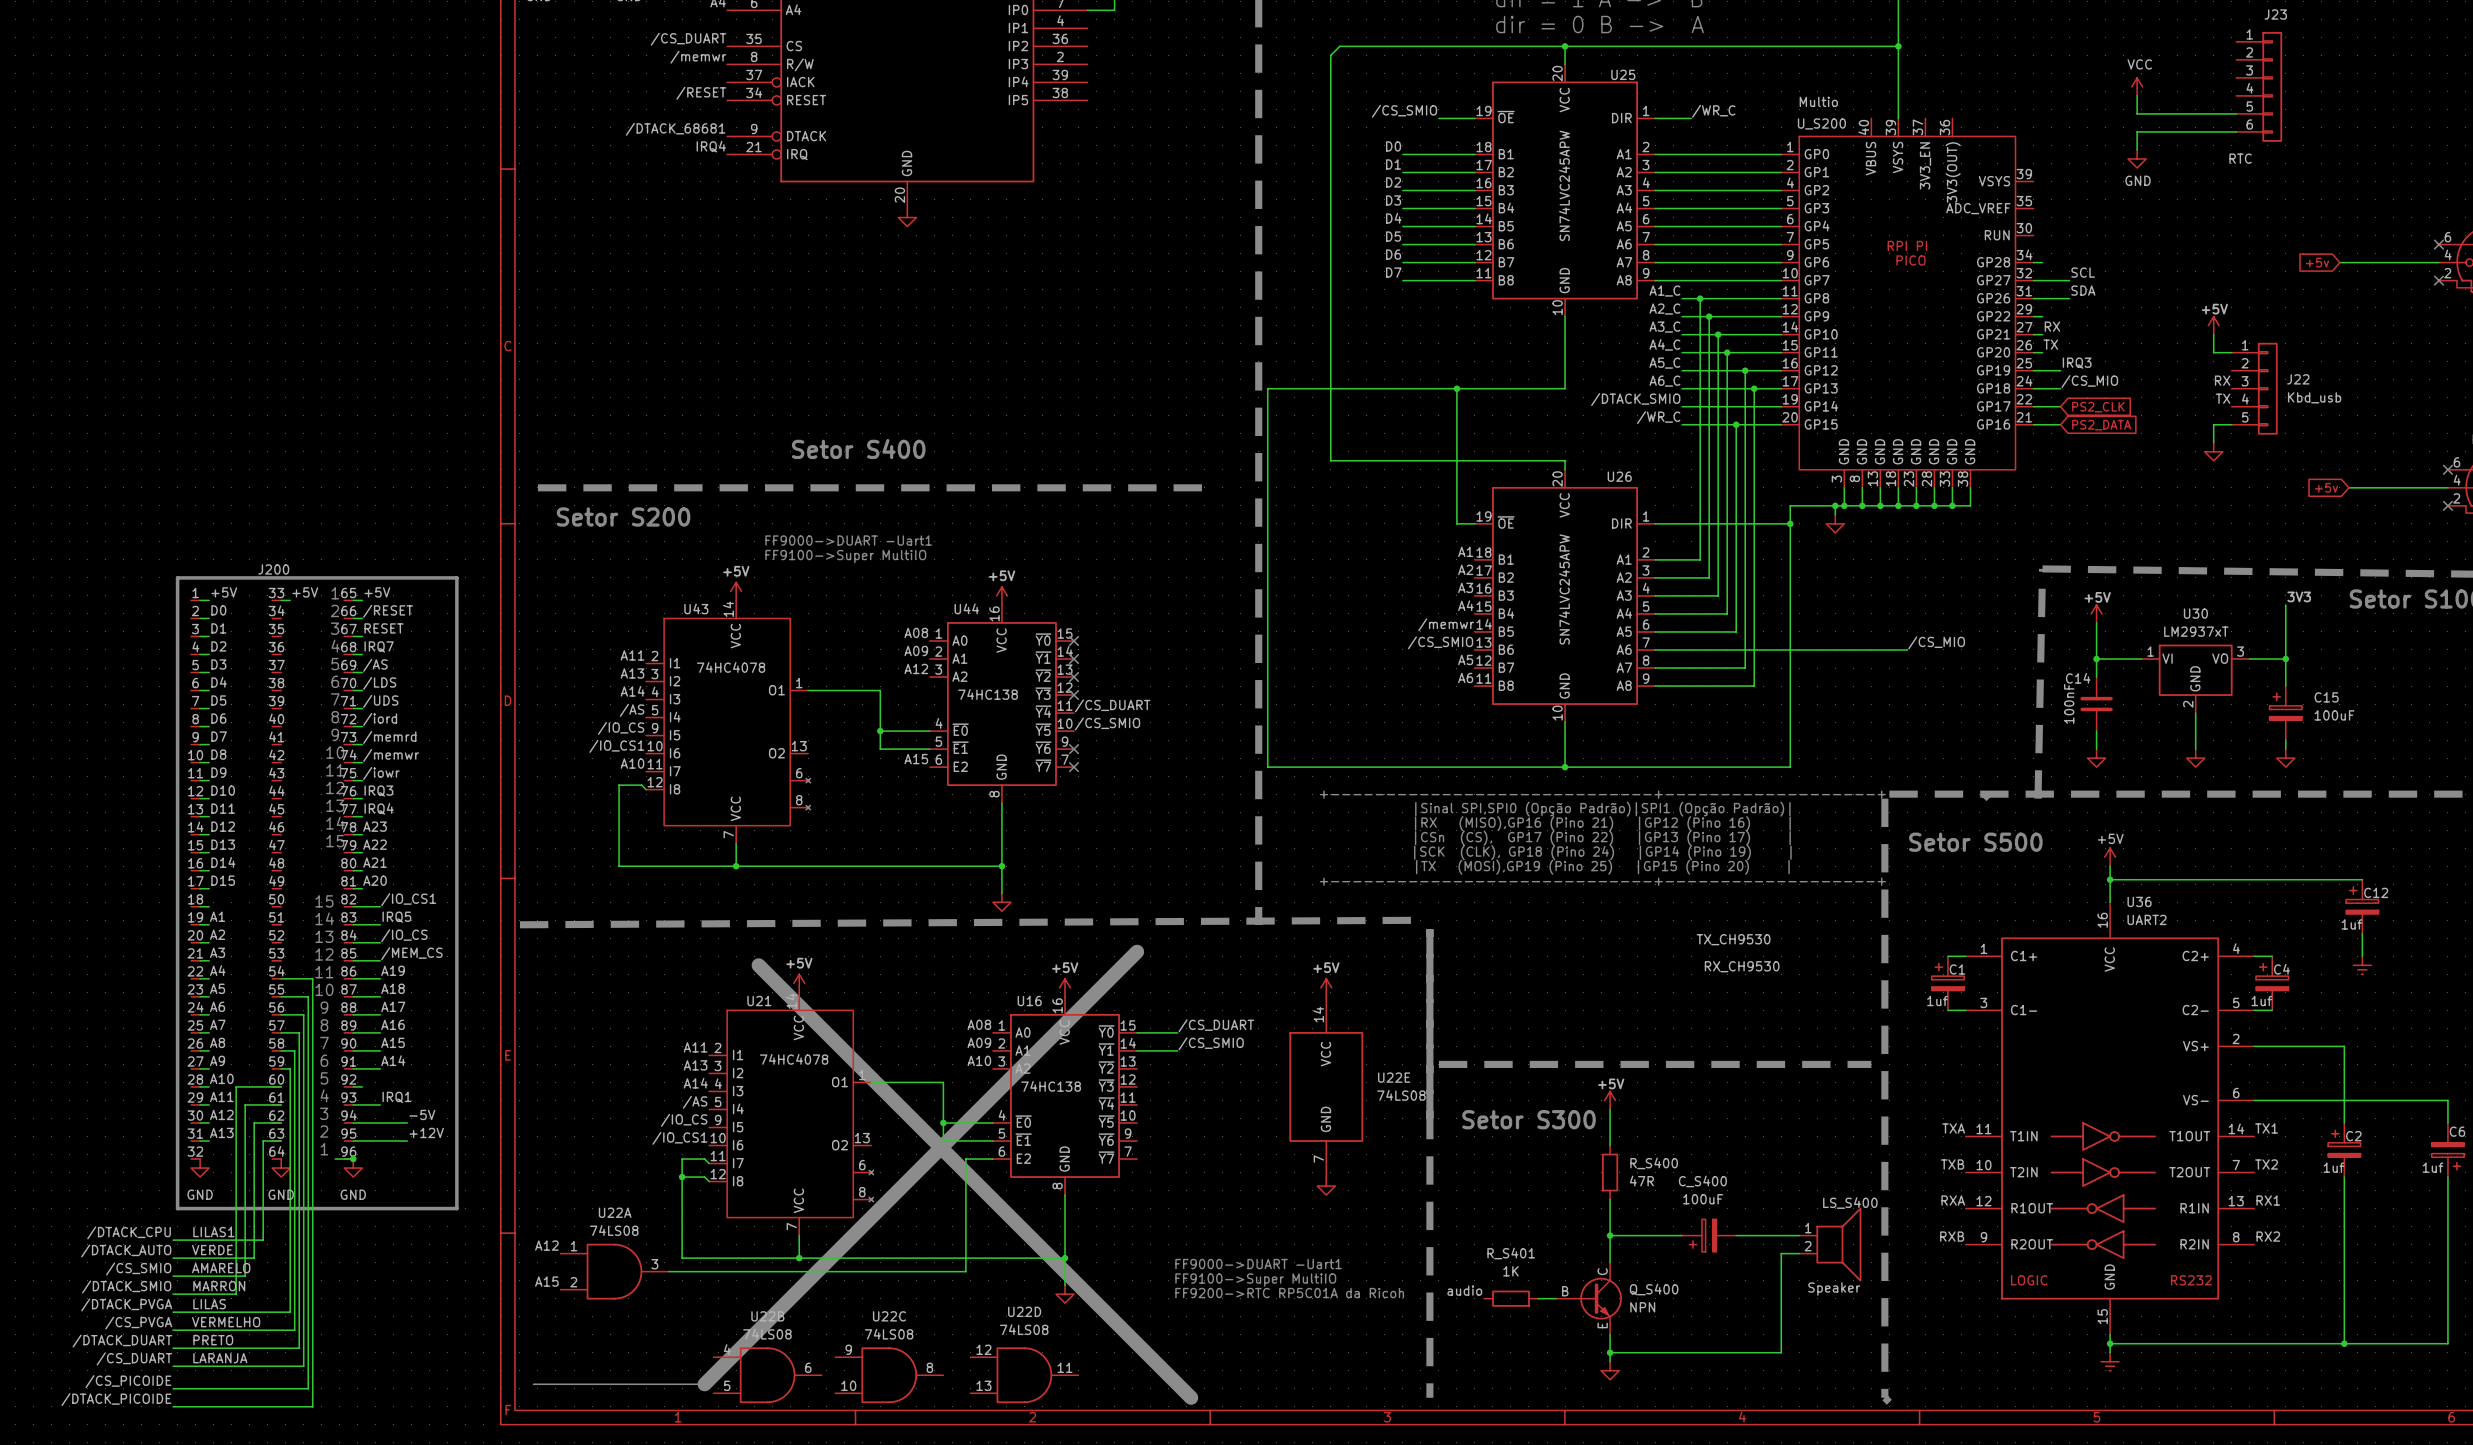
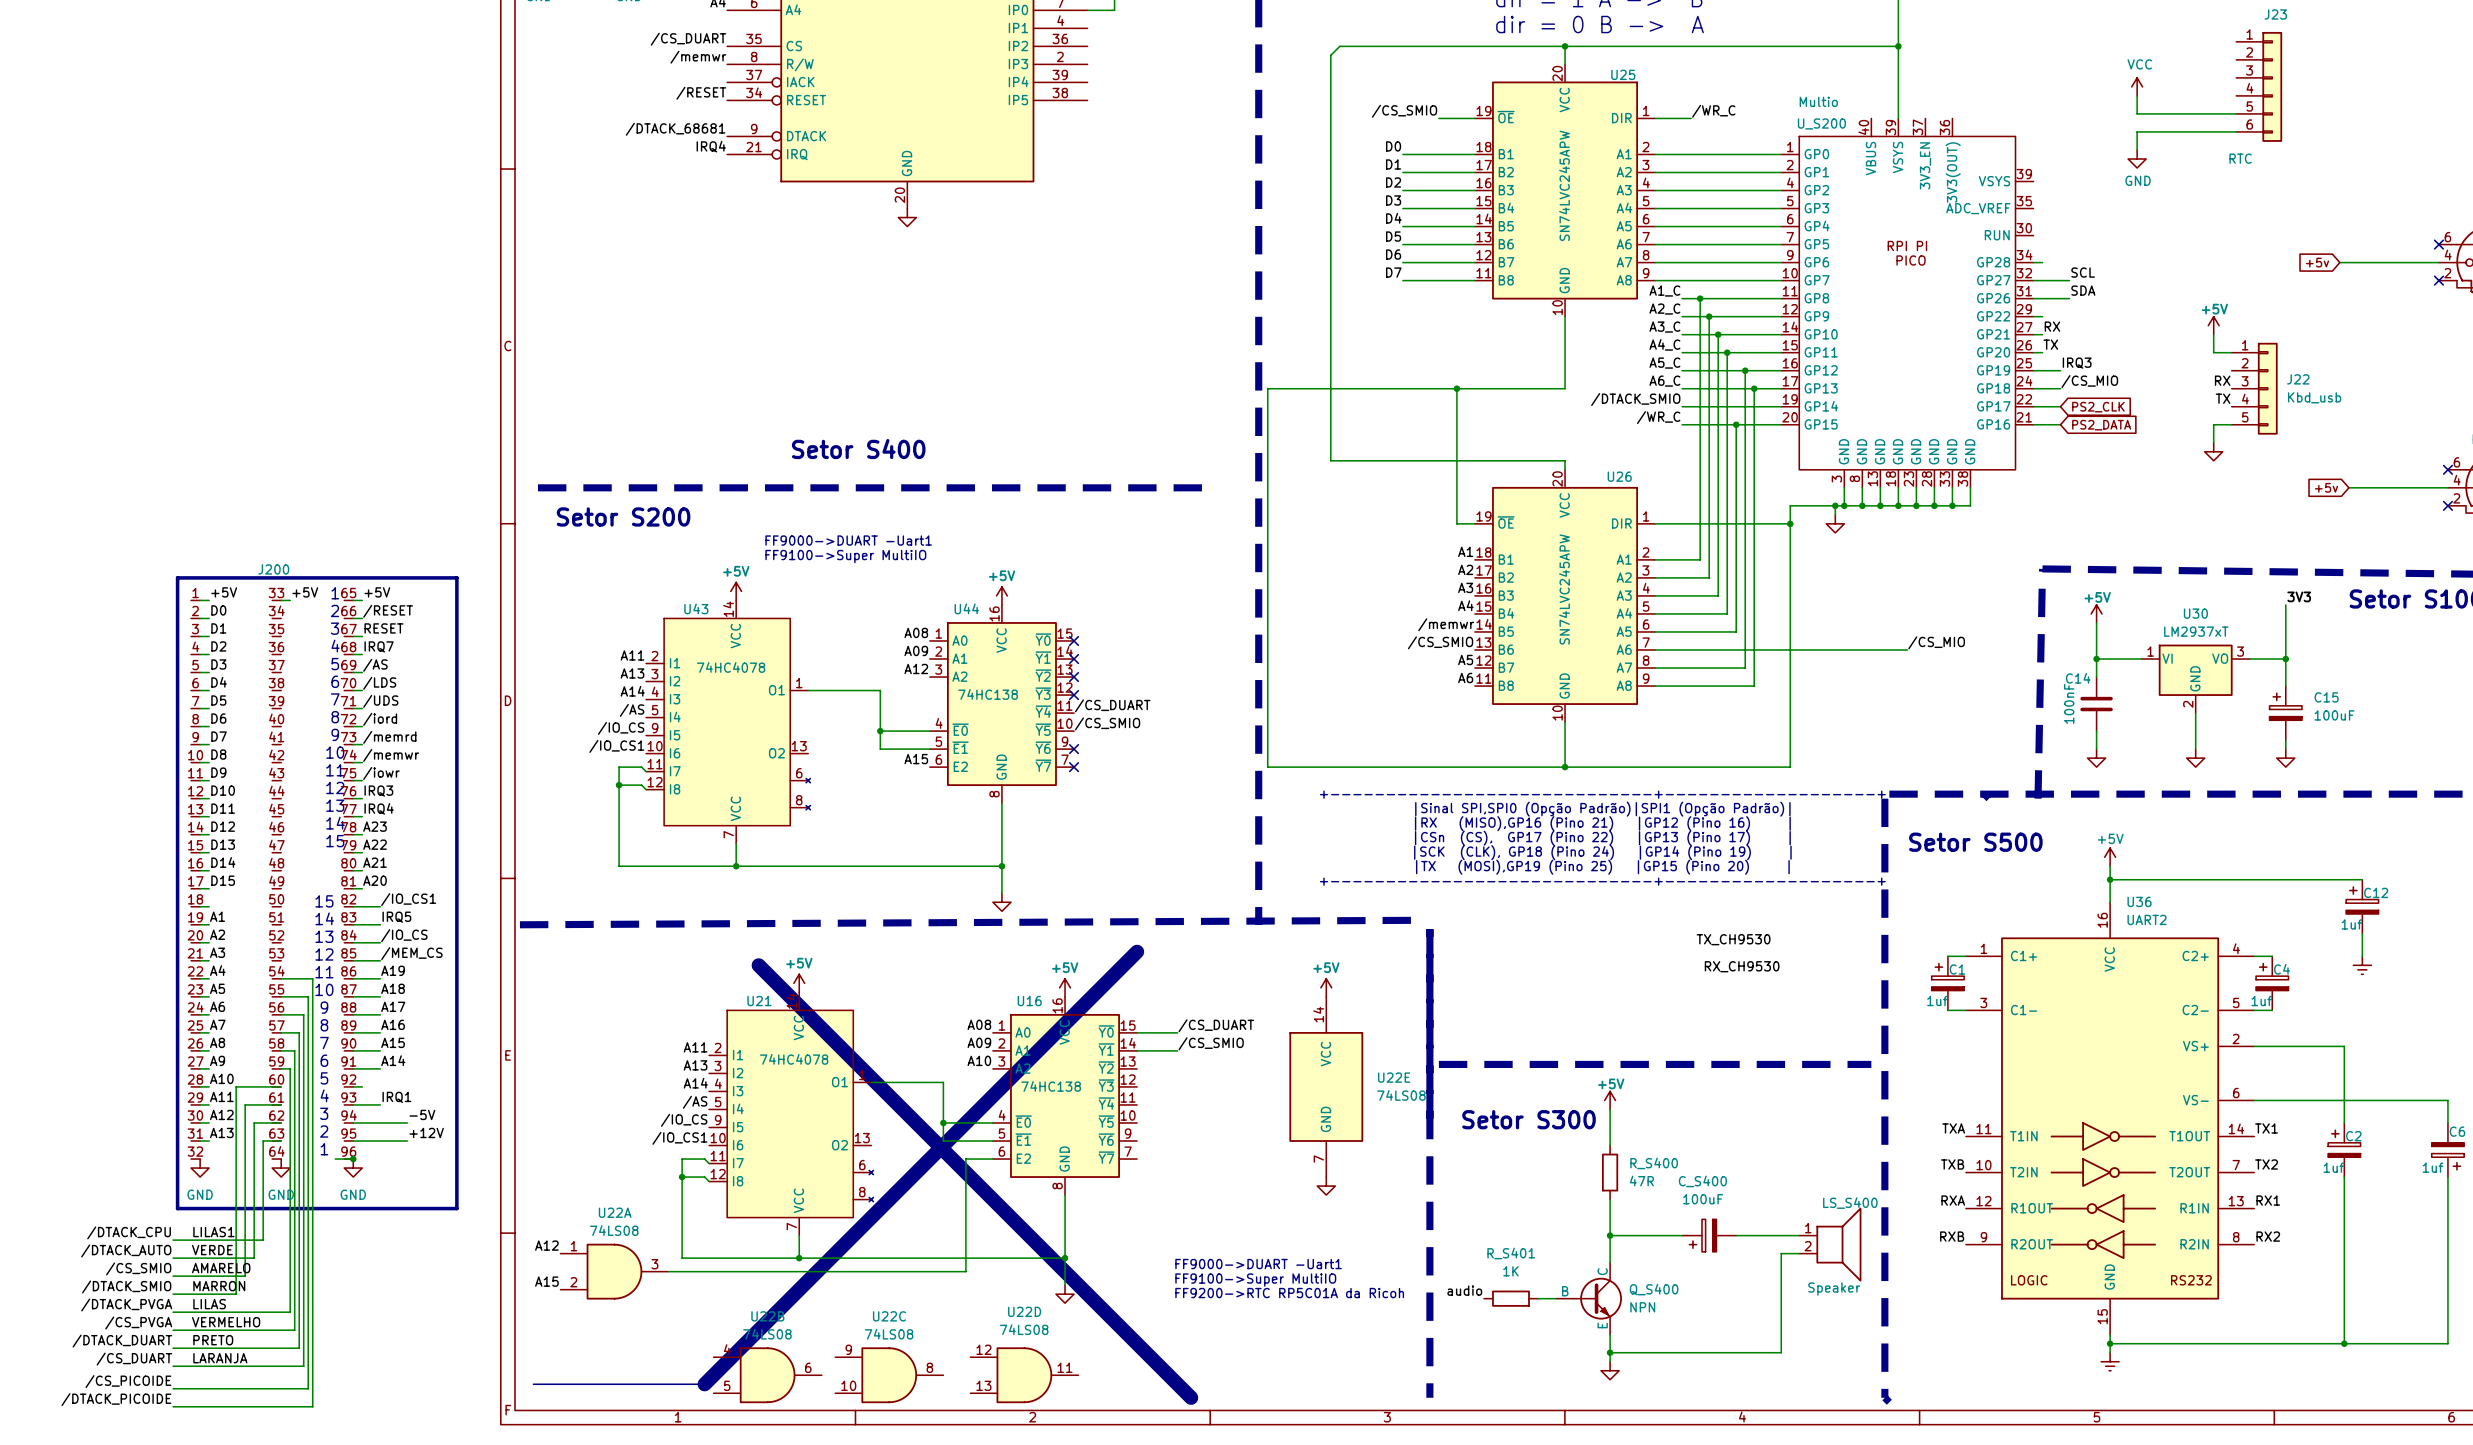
label: A10 (632, 763) -> none
wire: none -> (646, 771) (641, 767) (619, 767) (619, 785)
junction: none -> (619, 785)

